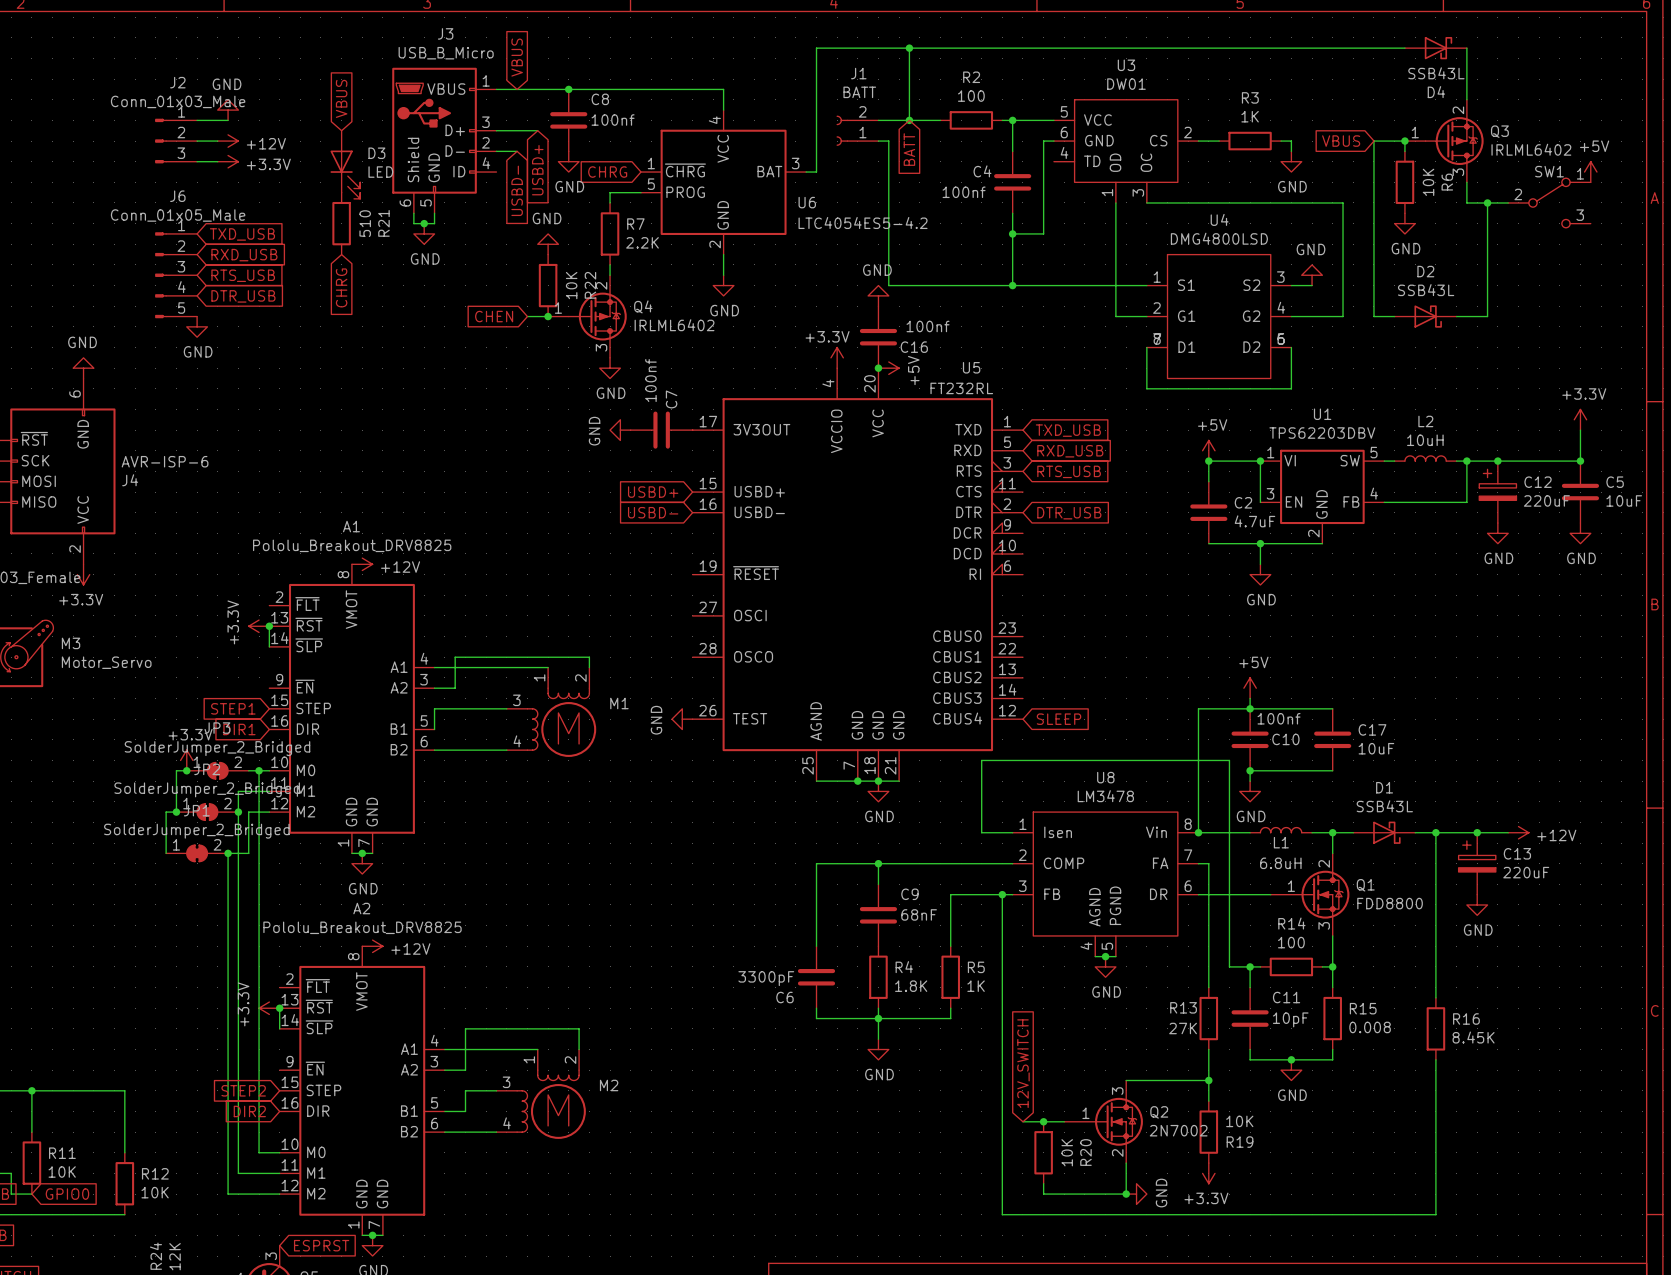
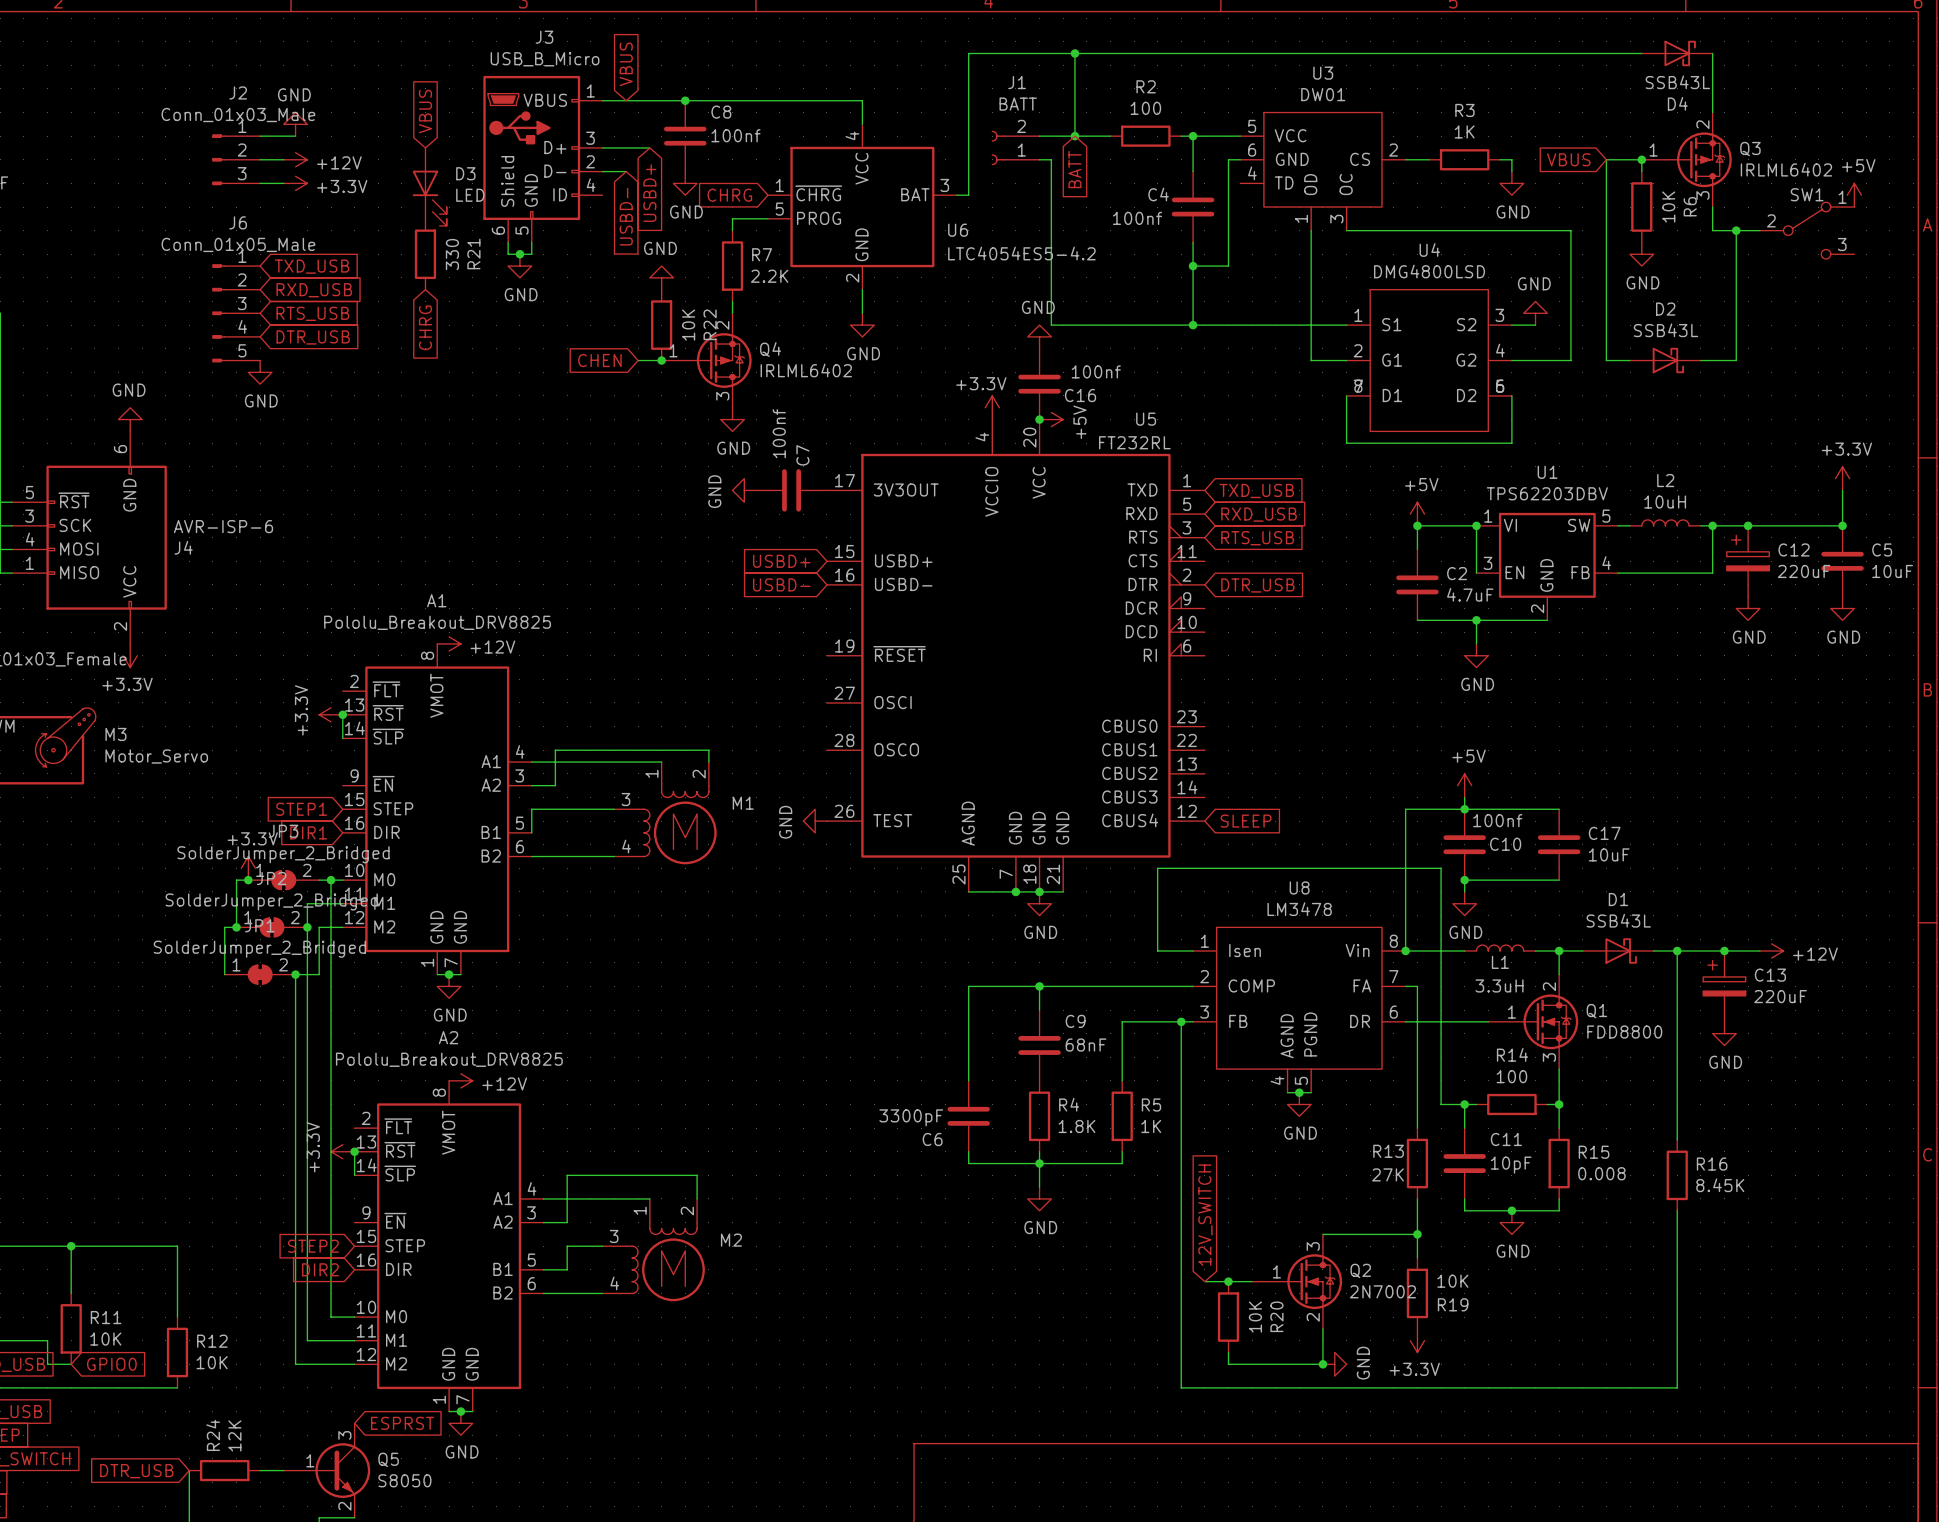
R21 value: 510 (365, 223) -> 330 (452, 254)
L1 value: 6.8uH (1280, 863) -> 3.3uH (1499, 985)

